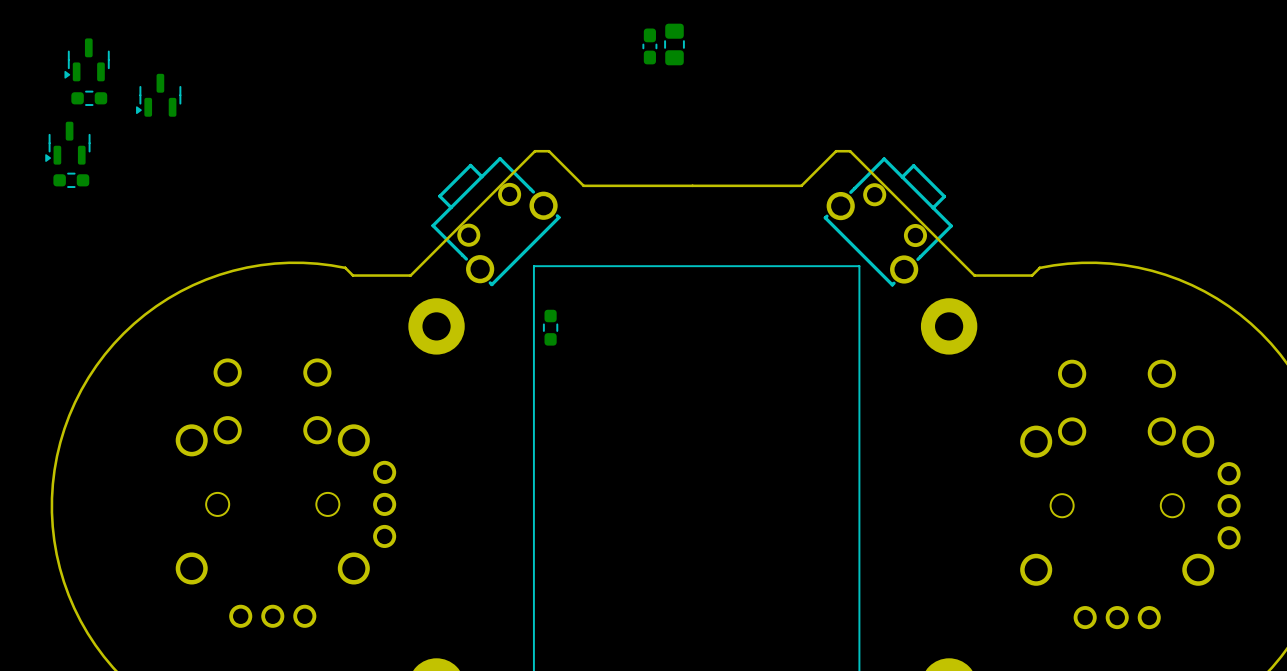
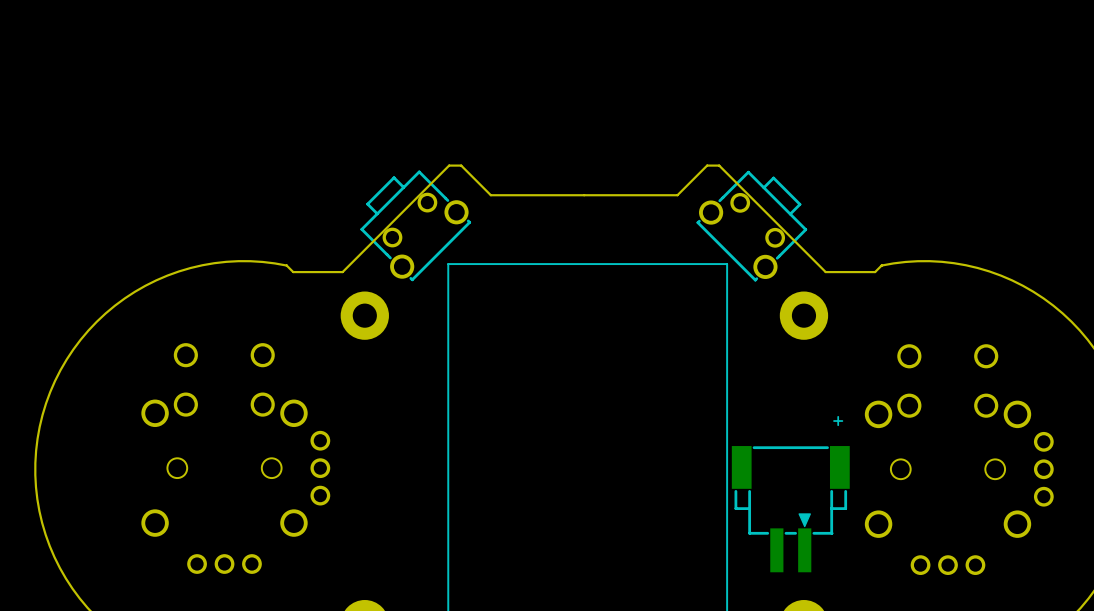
part: (674, 44) -> none
part: (649, 46) -> none
part: (87, 59) -> none
part: (158, 95) -> none
part: (89, 98) -> none
part: (67, 143) -> none
part: (71, 180) -> none
part: (550, 327) -> none
text: none -> + (838, 421)
part: none -> (790, 509)

